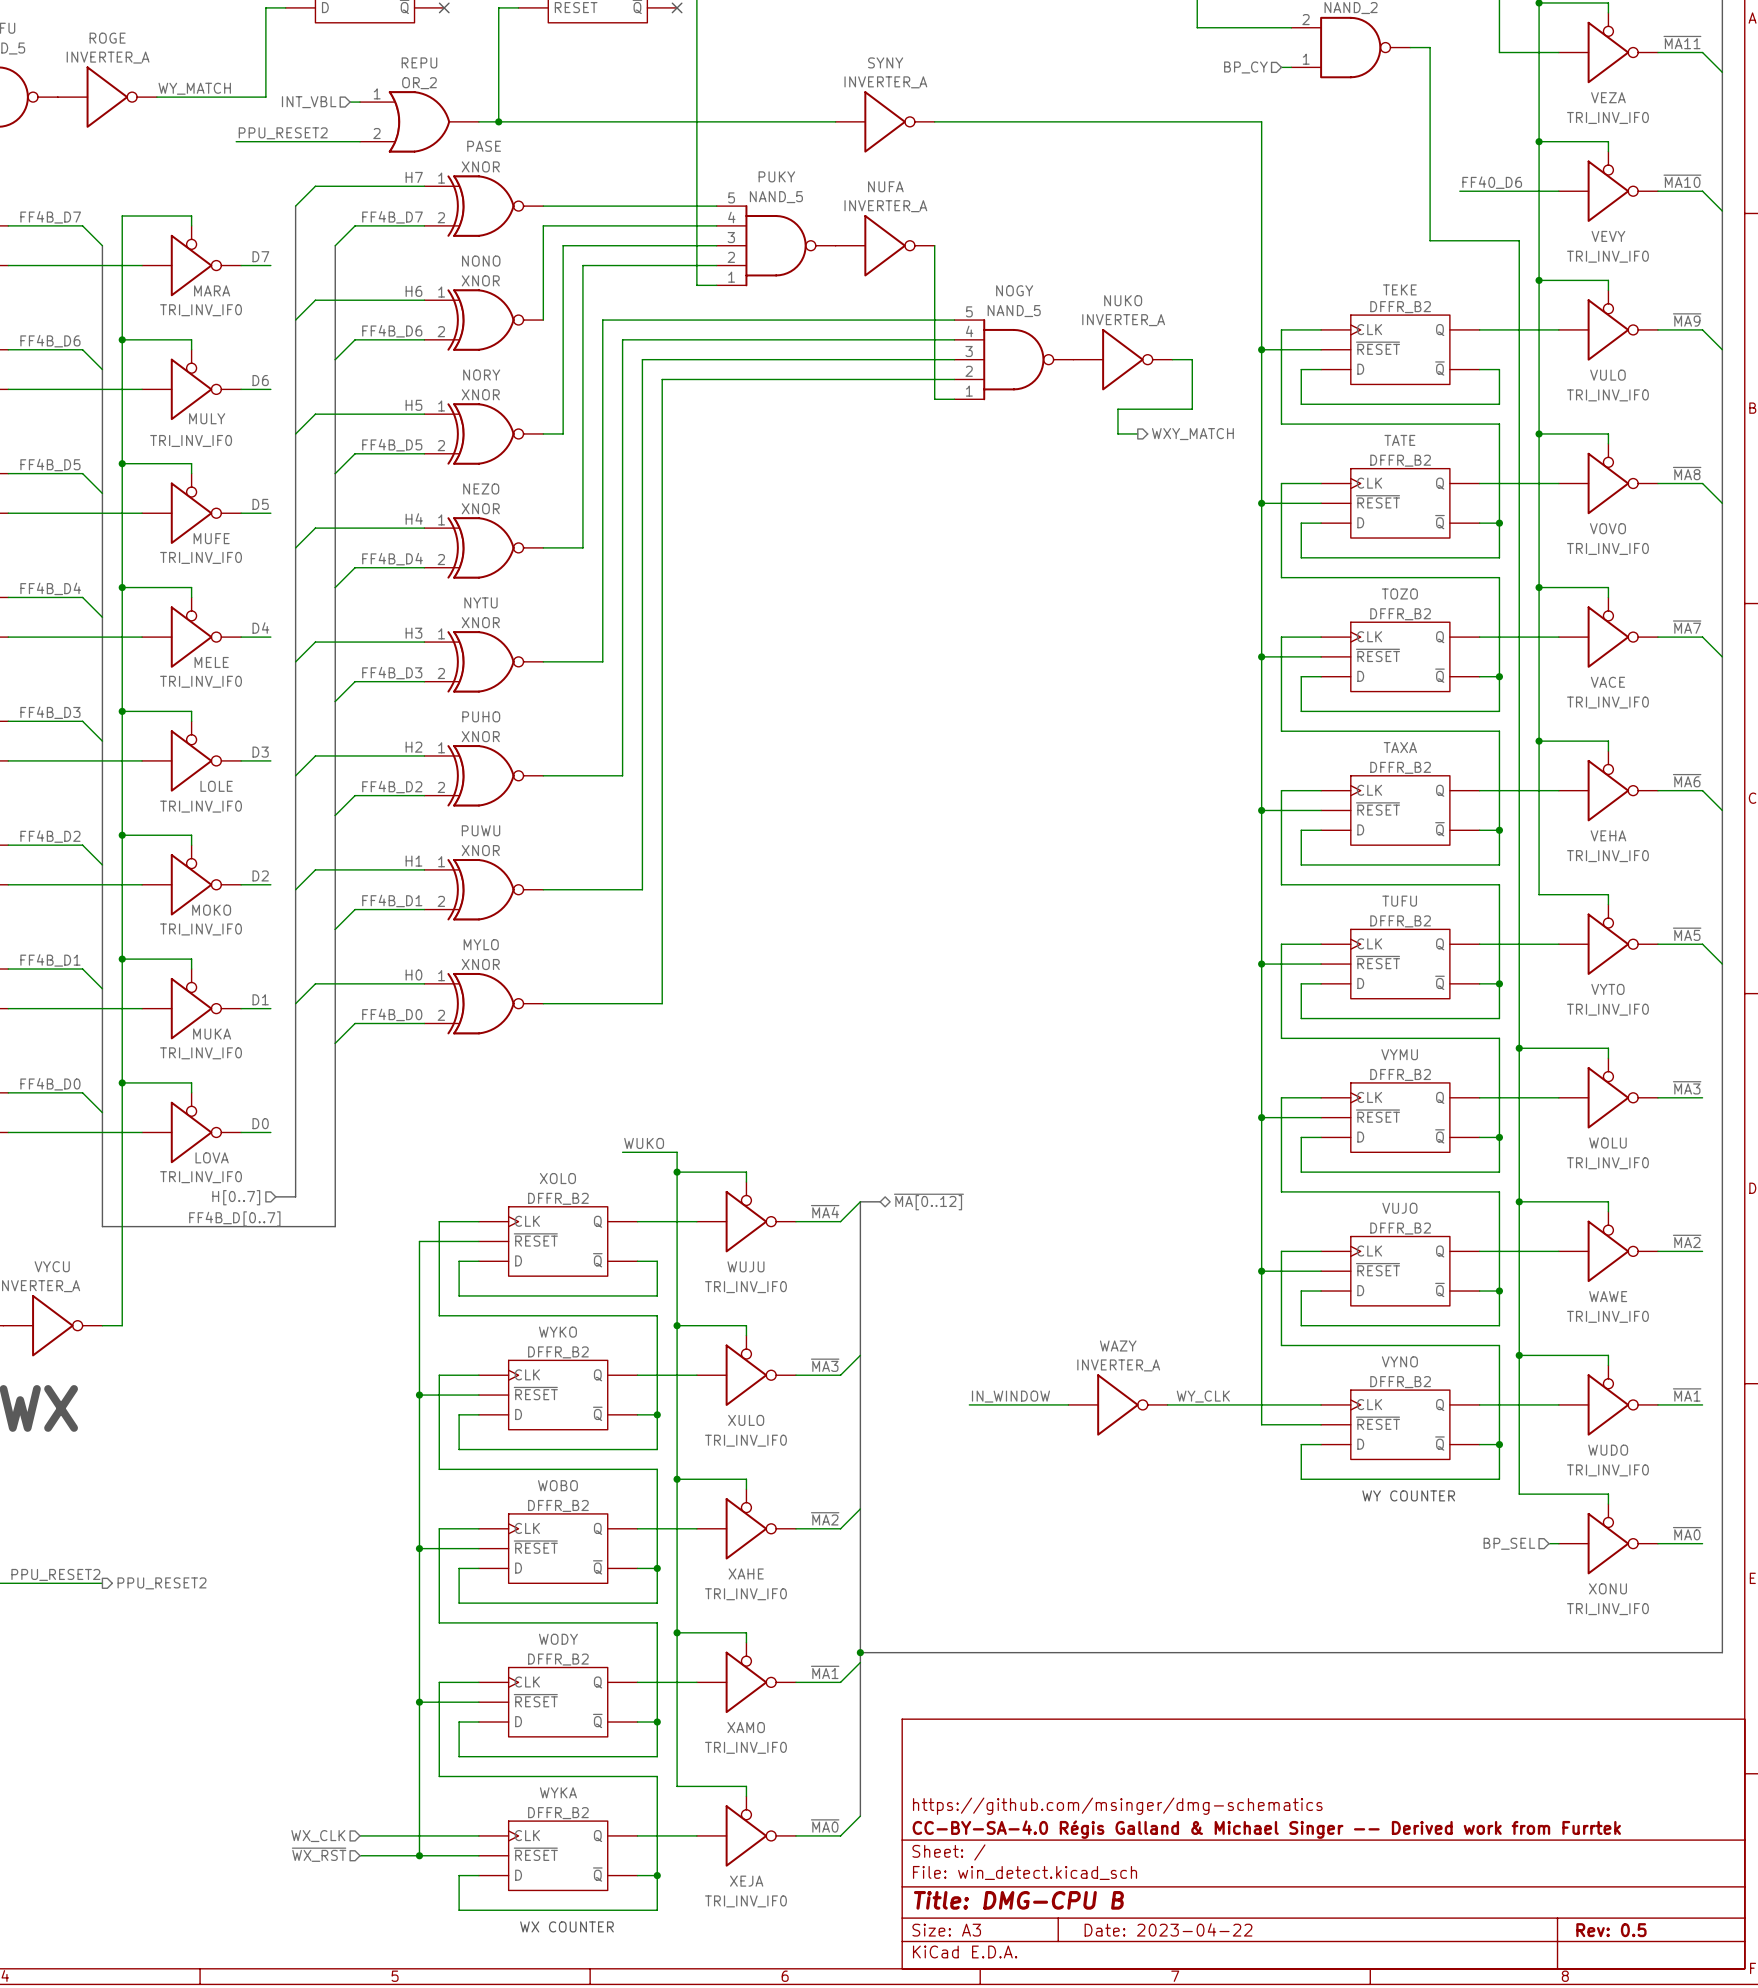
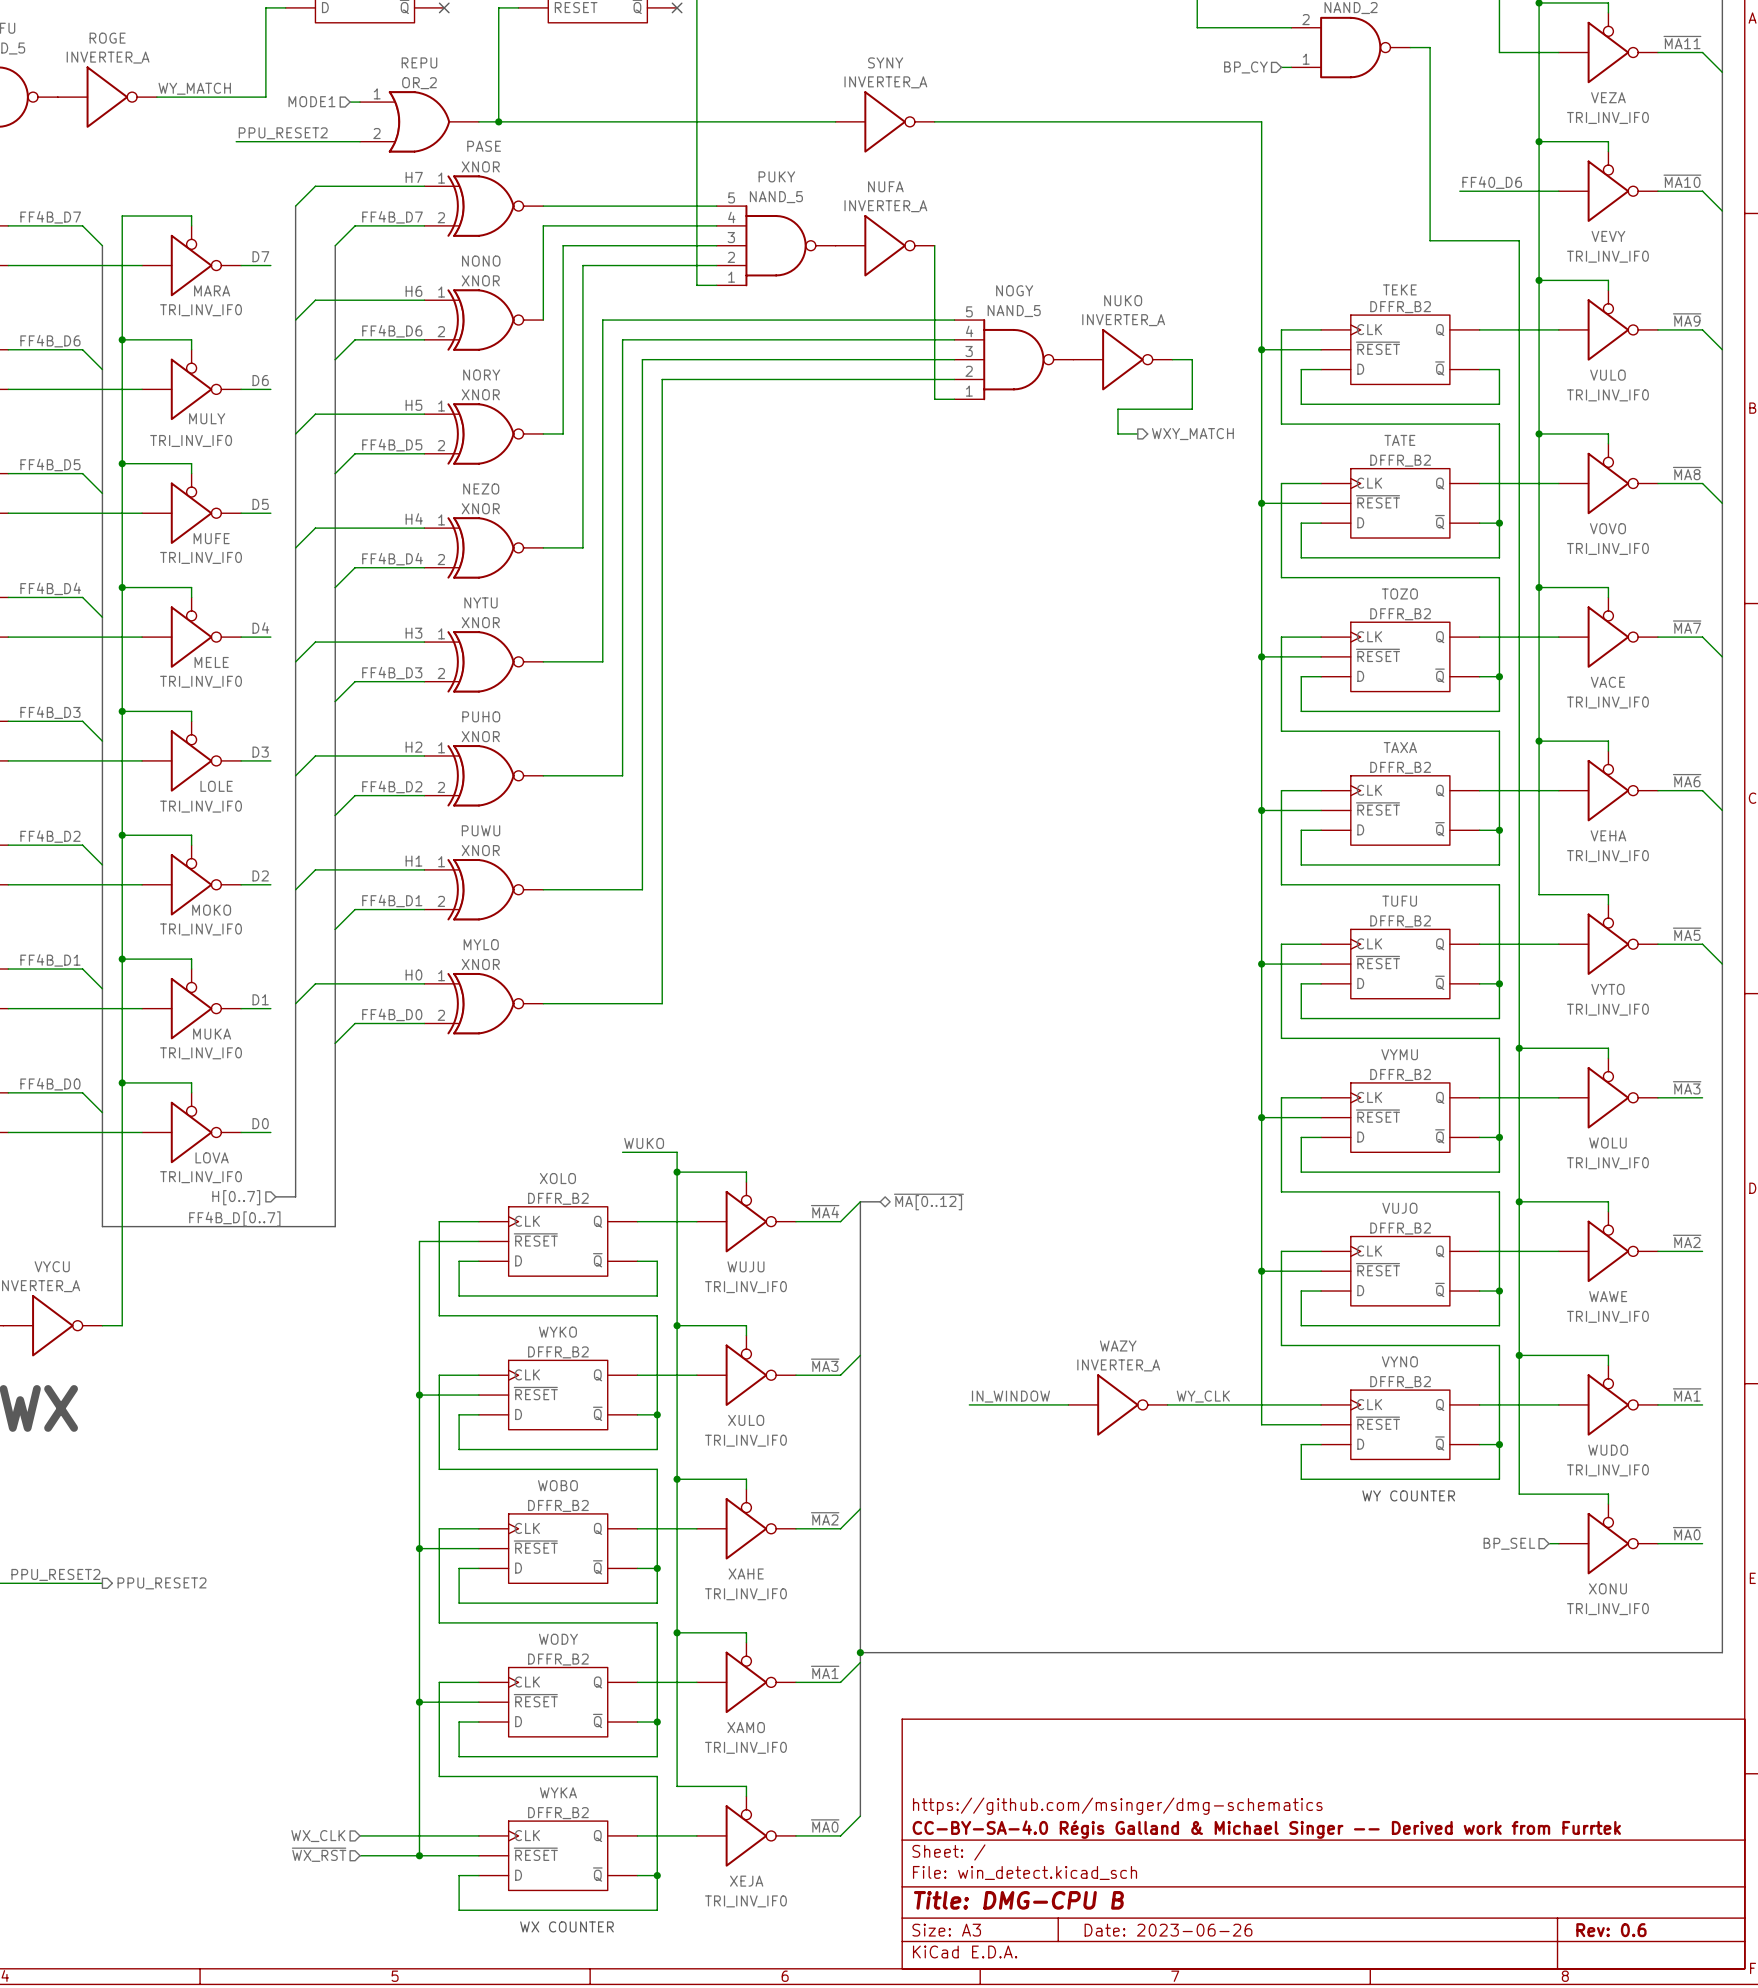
hierarchical label: INT_VBL (309, 102) -> MODE1 (311, 101)
title block: Date: 2023-04-22 (1168, 1929) -> Date: 2023-06-26 (1168, 1930)
title block: Rev: 0.5 (1611, 1930) -> Rev: 0.6 (1611, 1930)

